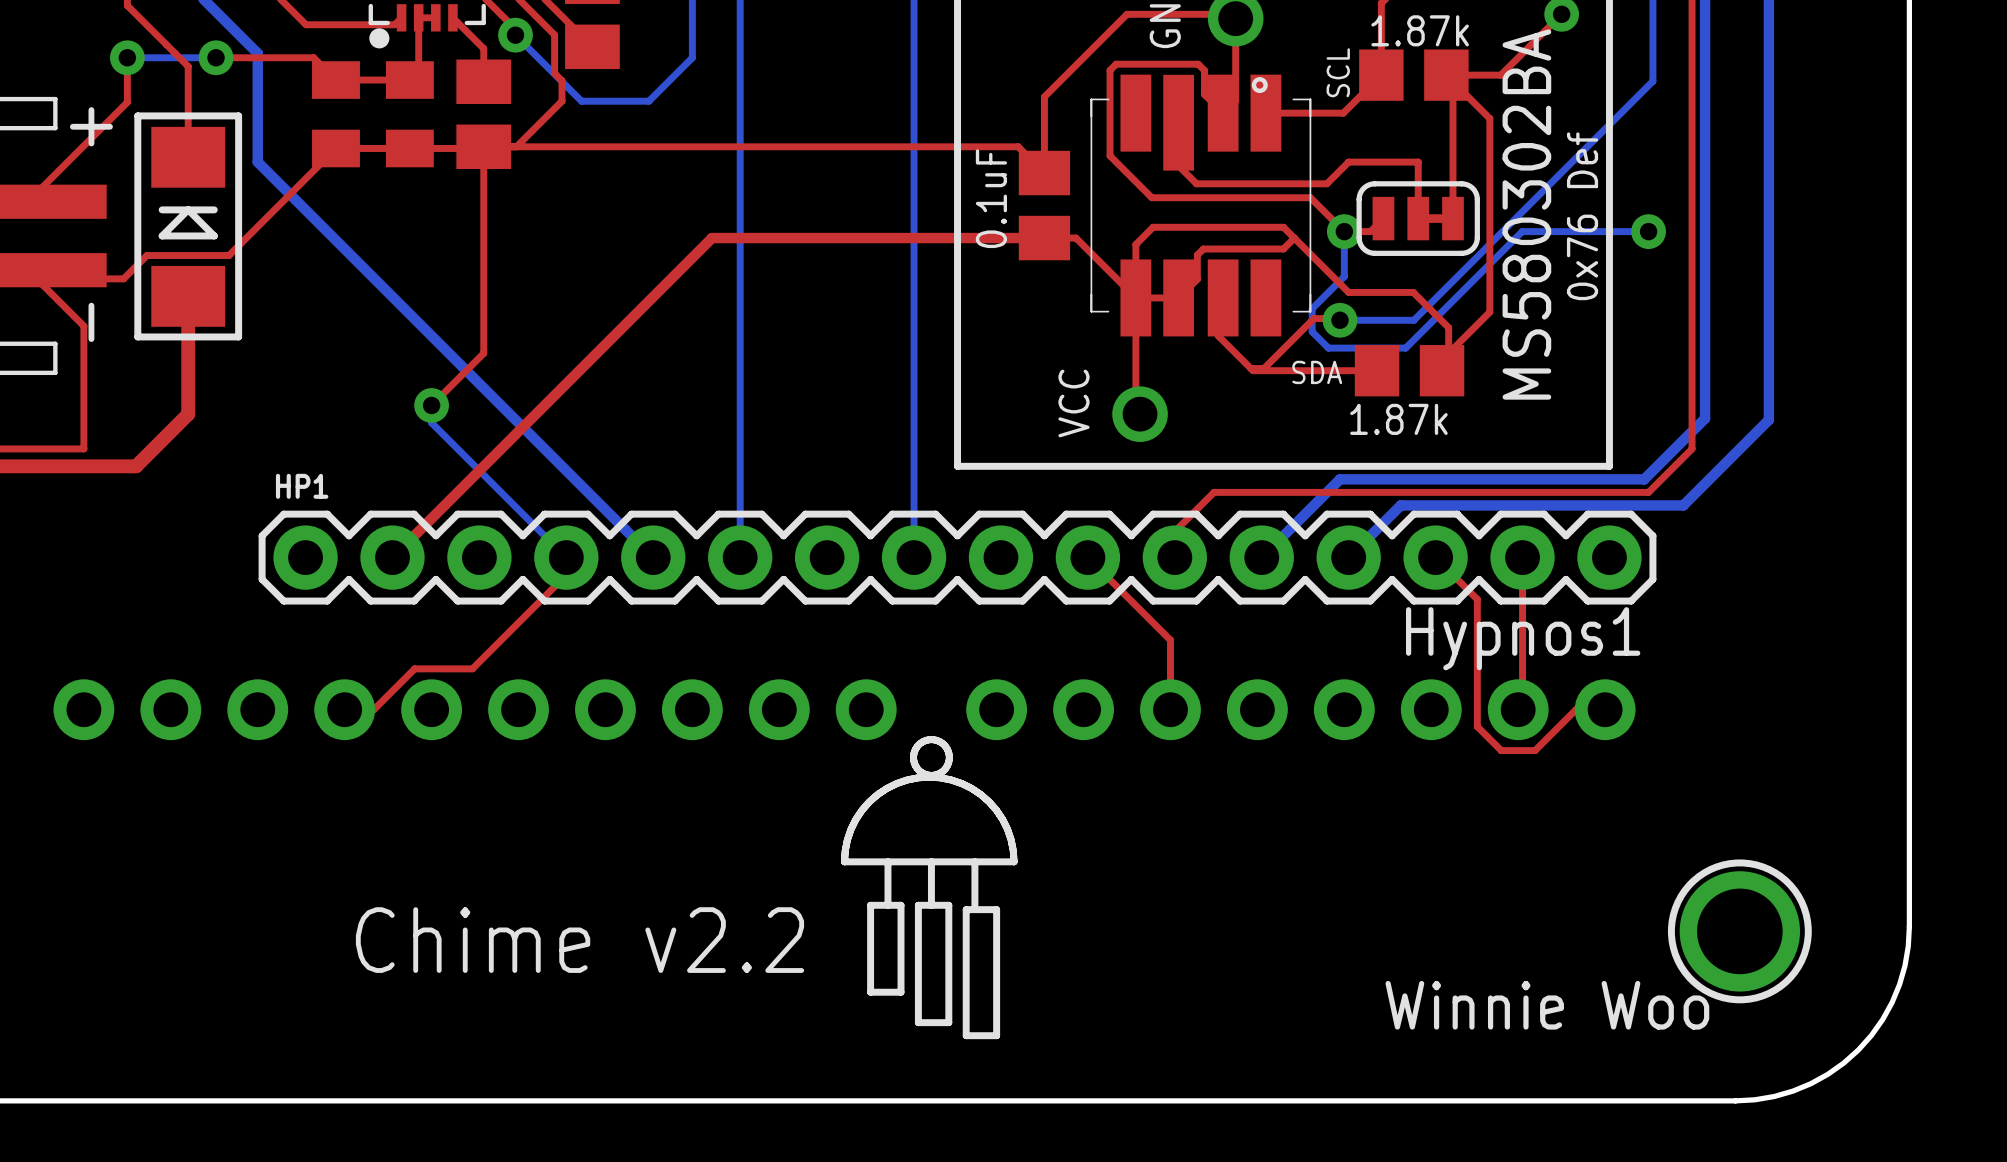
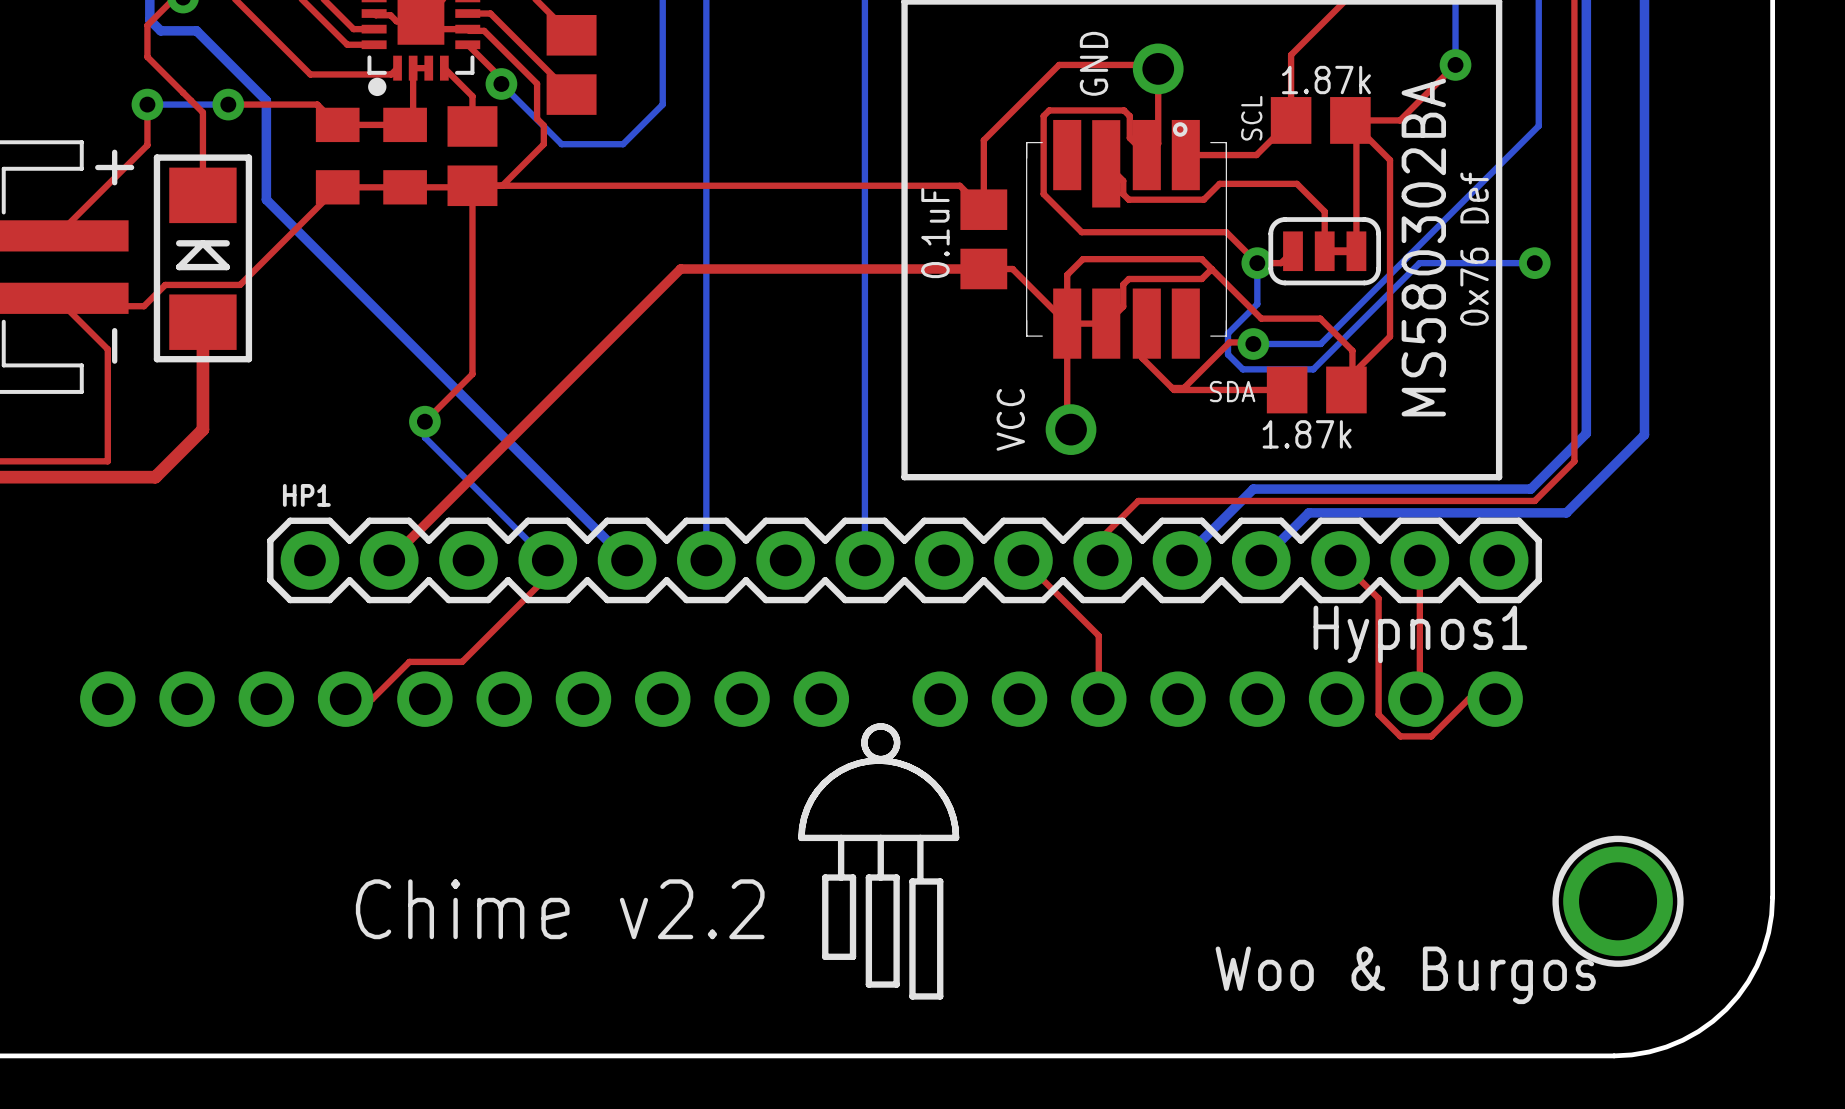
top track: (1178, 122) (1178, 165) (1196, 183) (1326, 183) (1348, 162) (1418, 162) (1418, 175) -> (1106, 163) (1123, 180) (1123, 194) (1128, 199) (1203, 199) (1219, 183) (1296, 183) (1324, 211)
text: Winnie Woo (1547, 1005) -> none
text: none -> Woo & Burgos (1405, 975)

